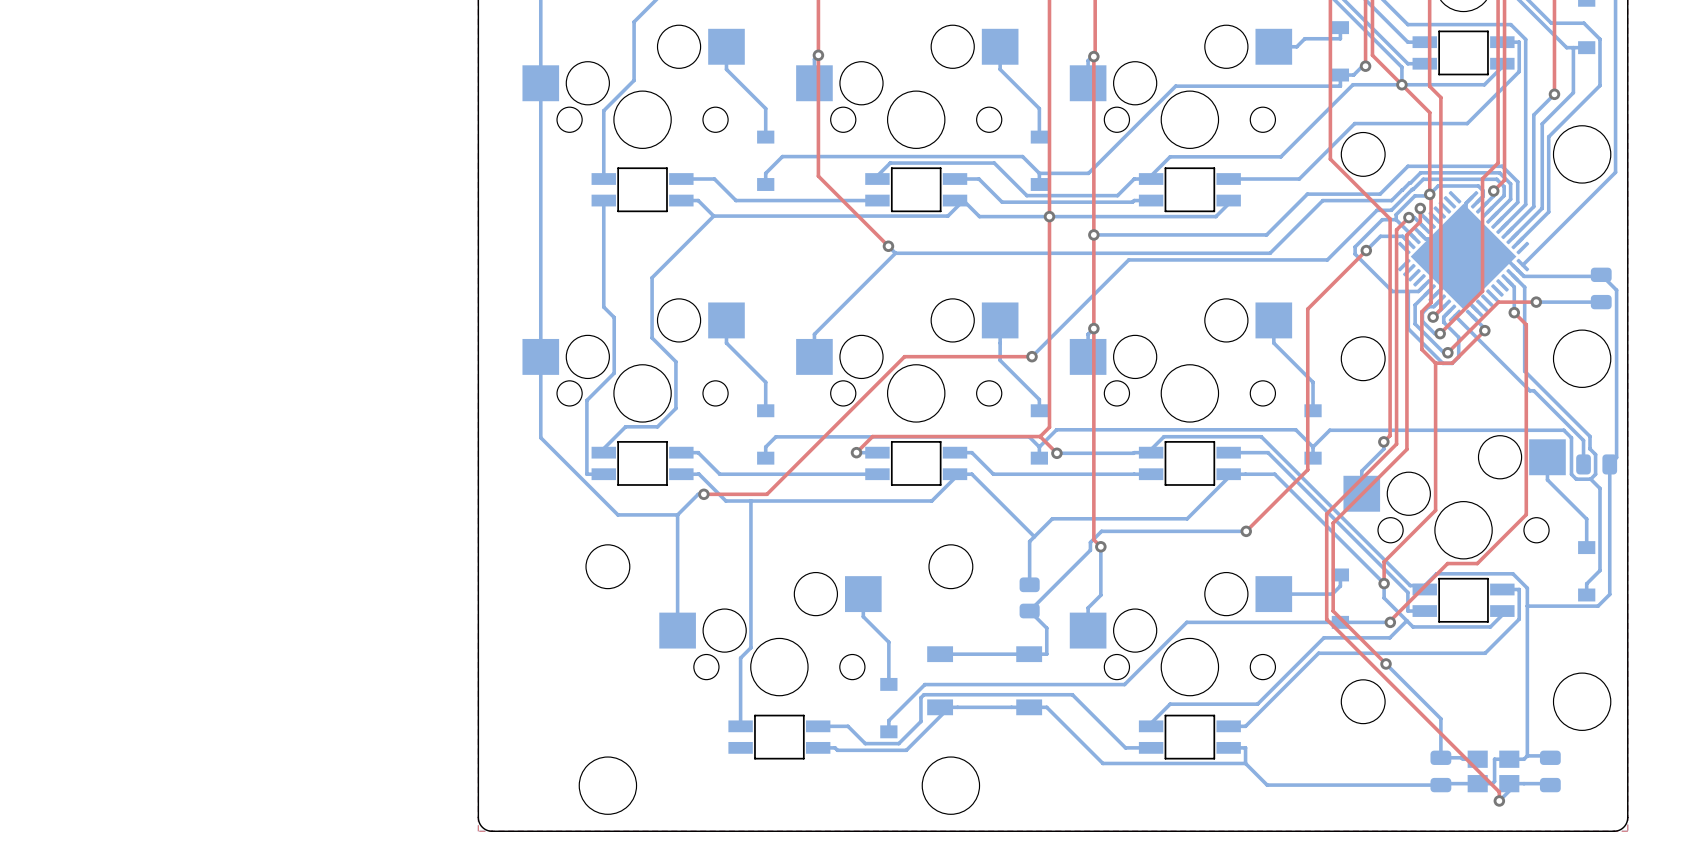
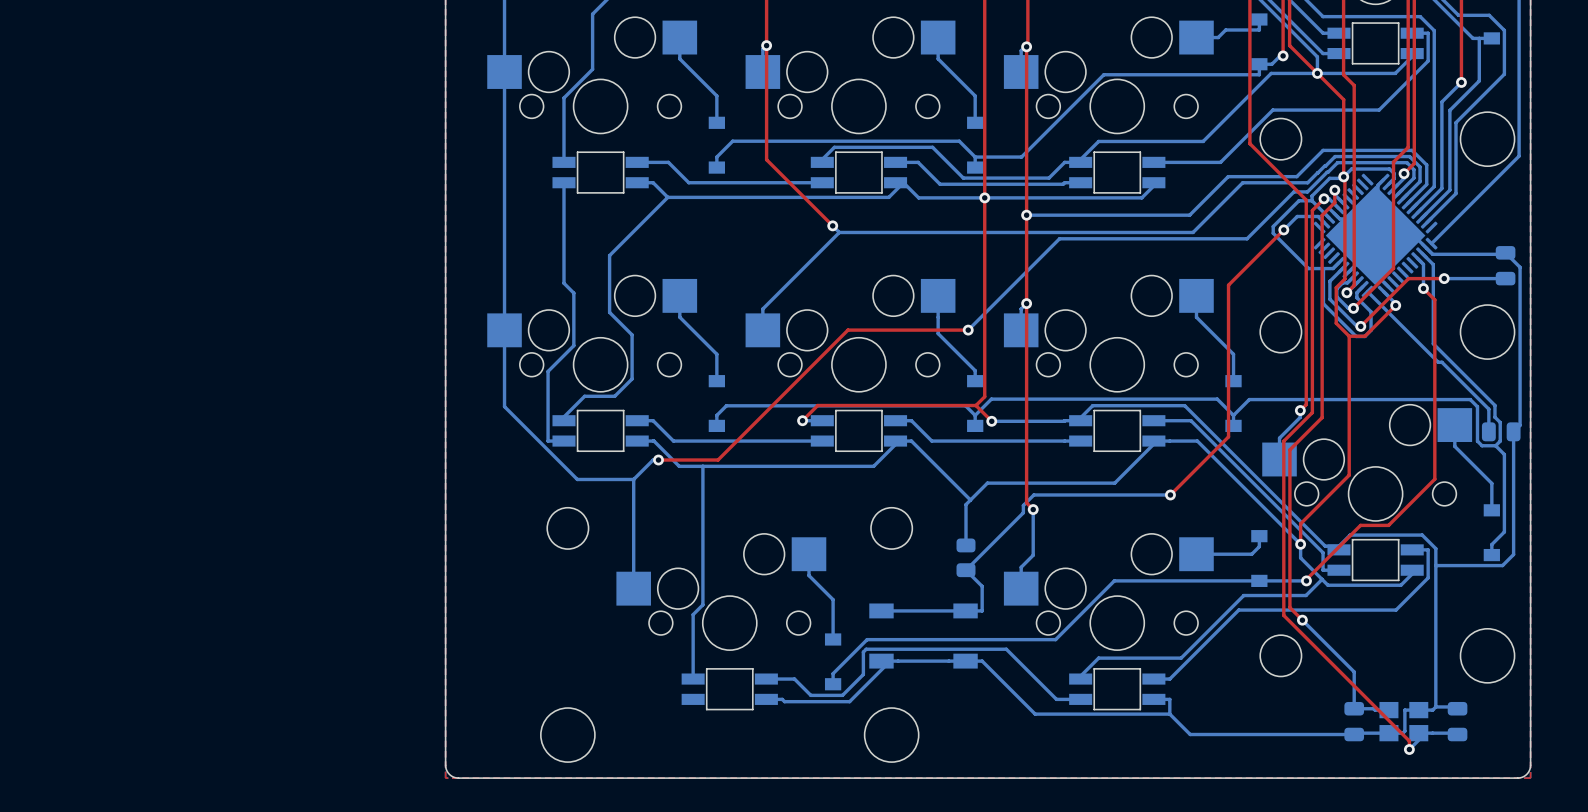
top track: (1366, 474) (1326, 513) (1326, 619) (1366, 658) -> (1283, 441) (1283, 615)
top track: (1372, 483) (1333, 523) (1333, 611) (1372, 650) -> (1289, 449) (1289, 607)

